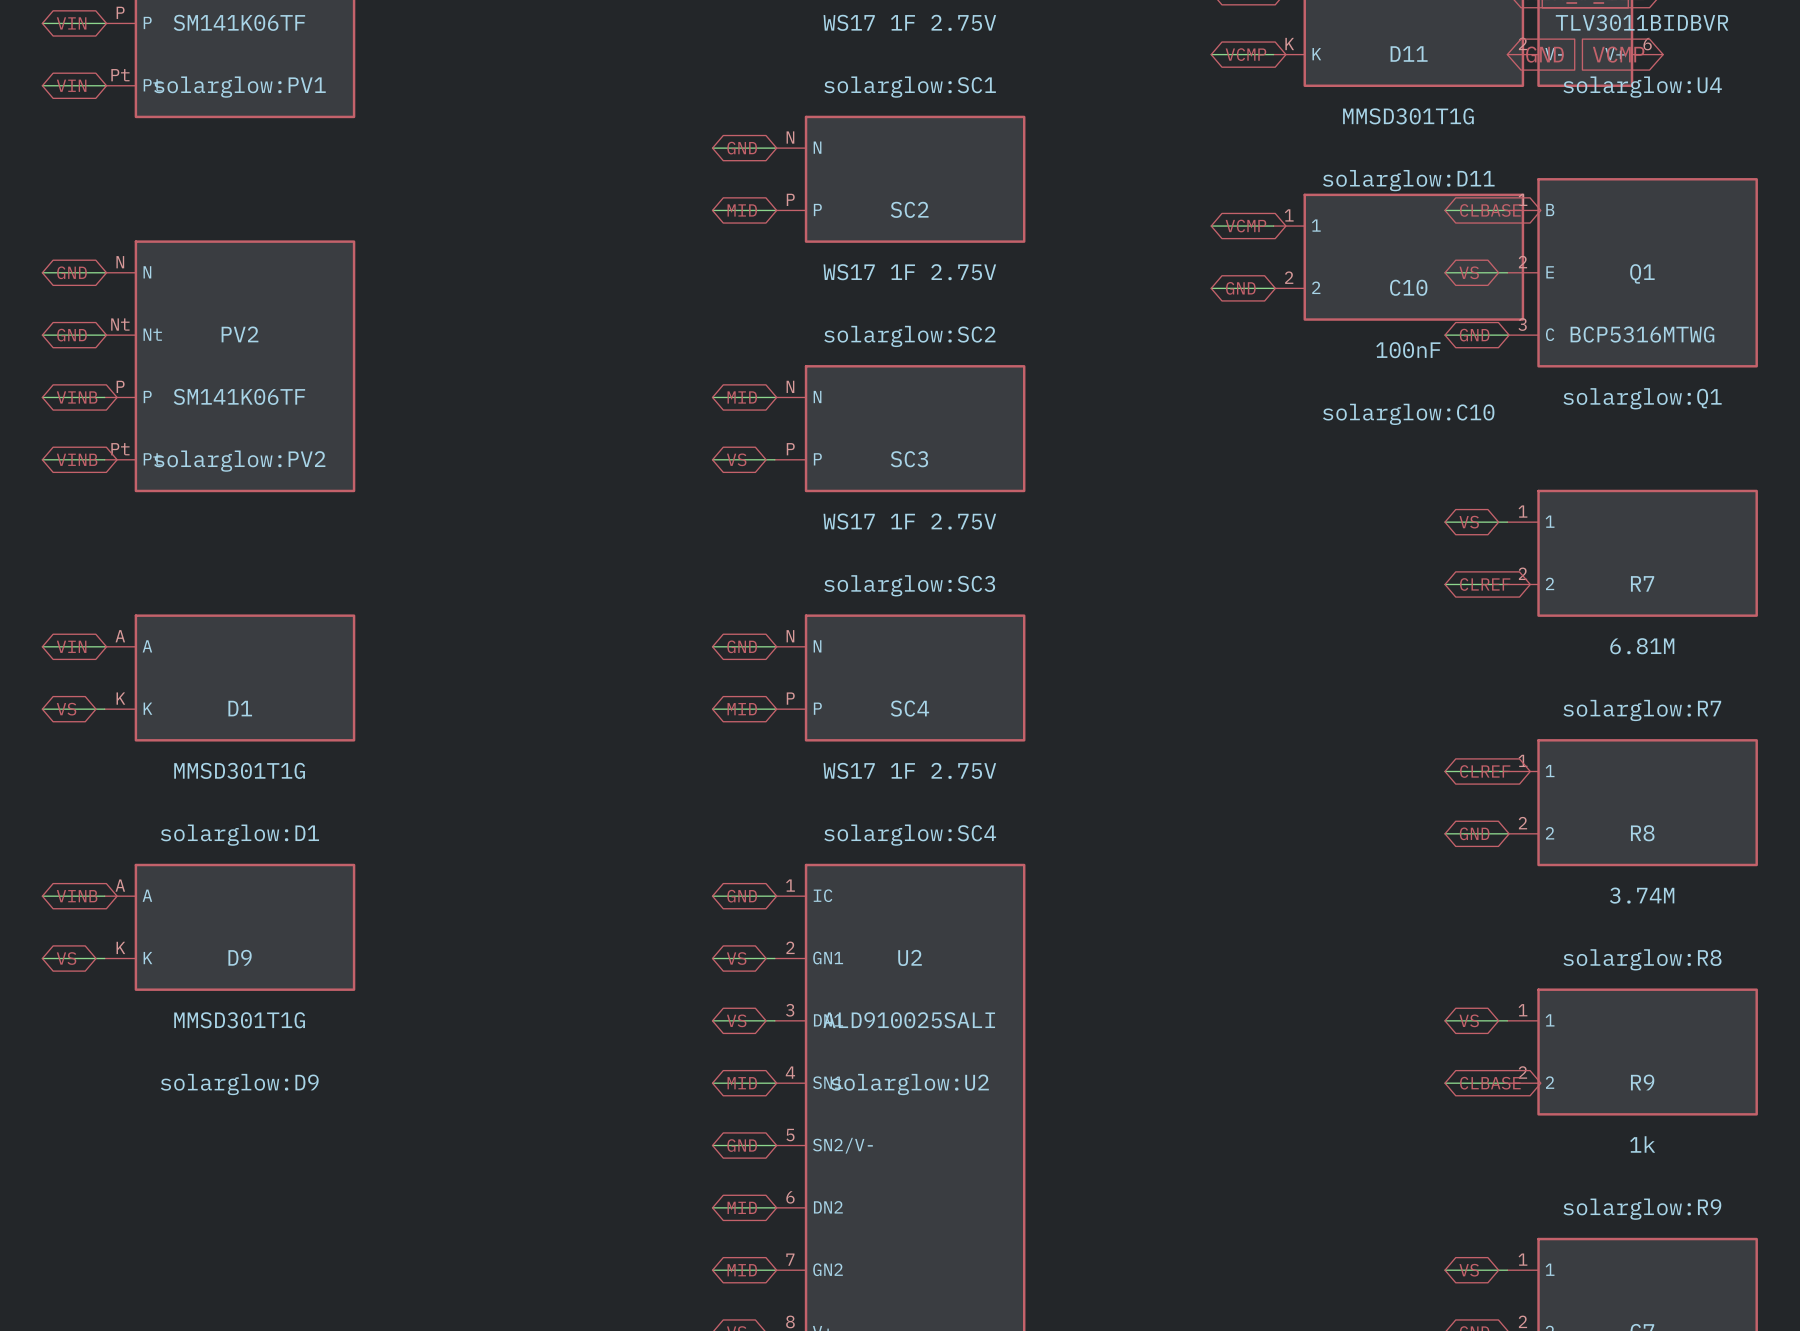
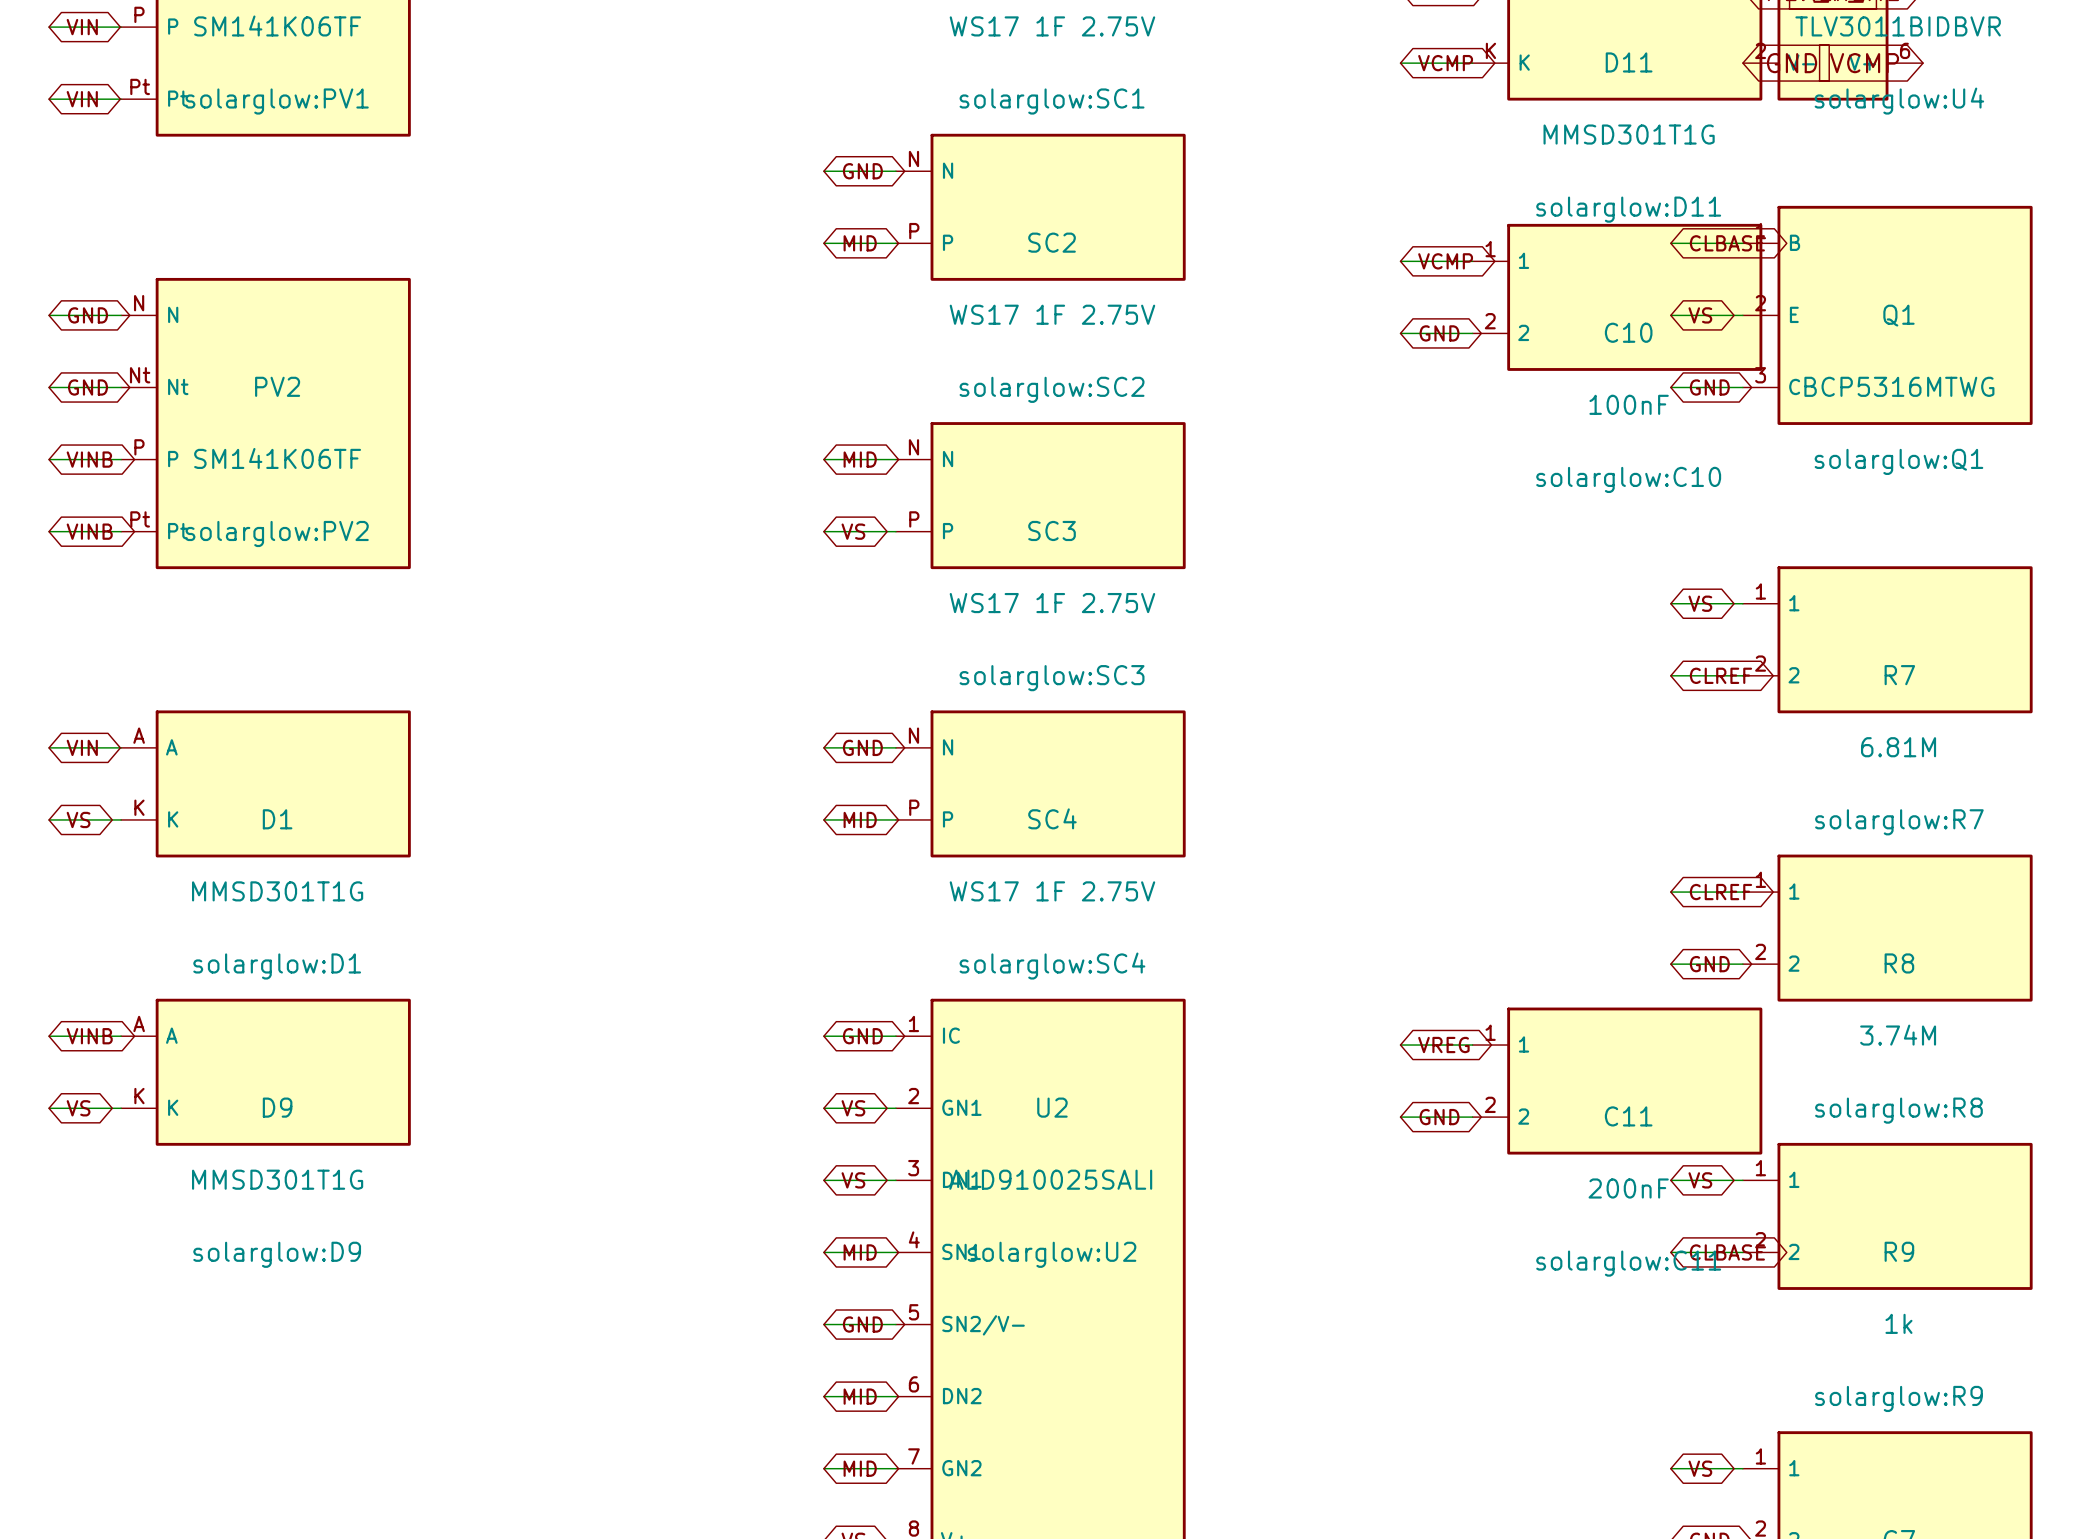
wire: none -> (1400, 1045) (1472, 1045)
global label: none -> VREG (1443, 1045)
C11: none -> 200nF (1617, 1081)
wire: none -> (1400, 1117) (1472, 1117)
global label: none -> GND (1439, 1117)

